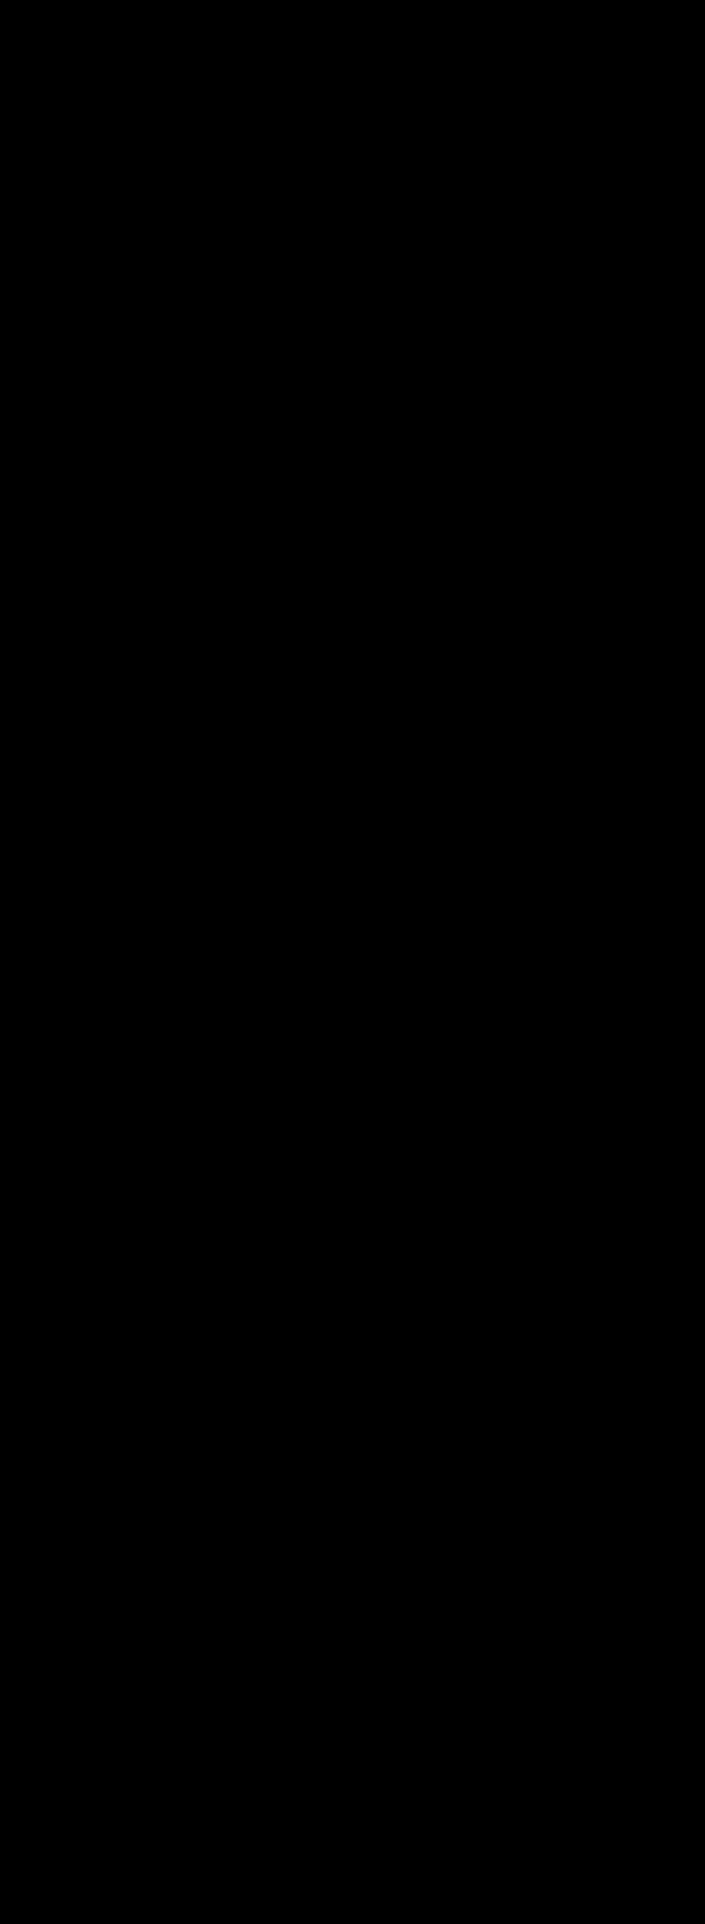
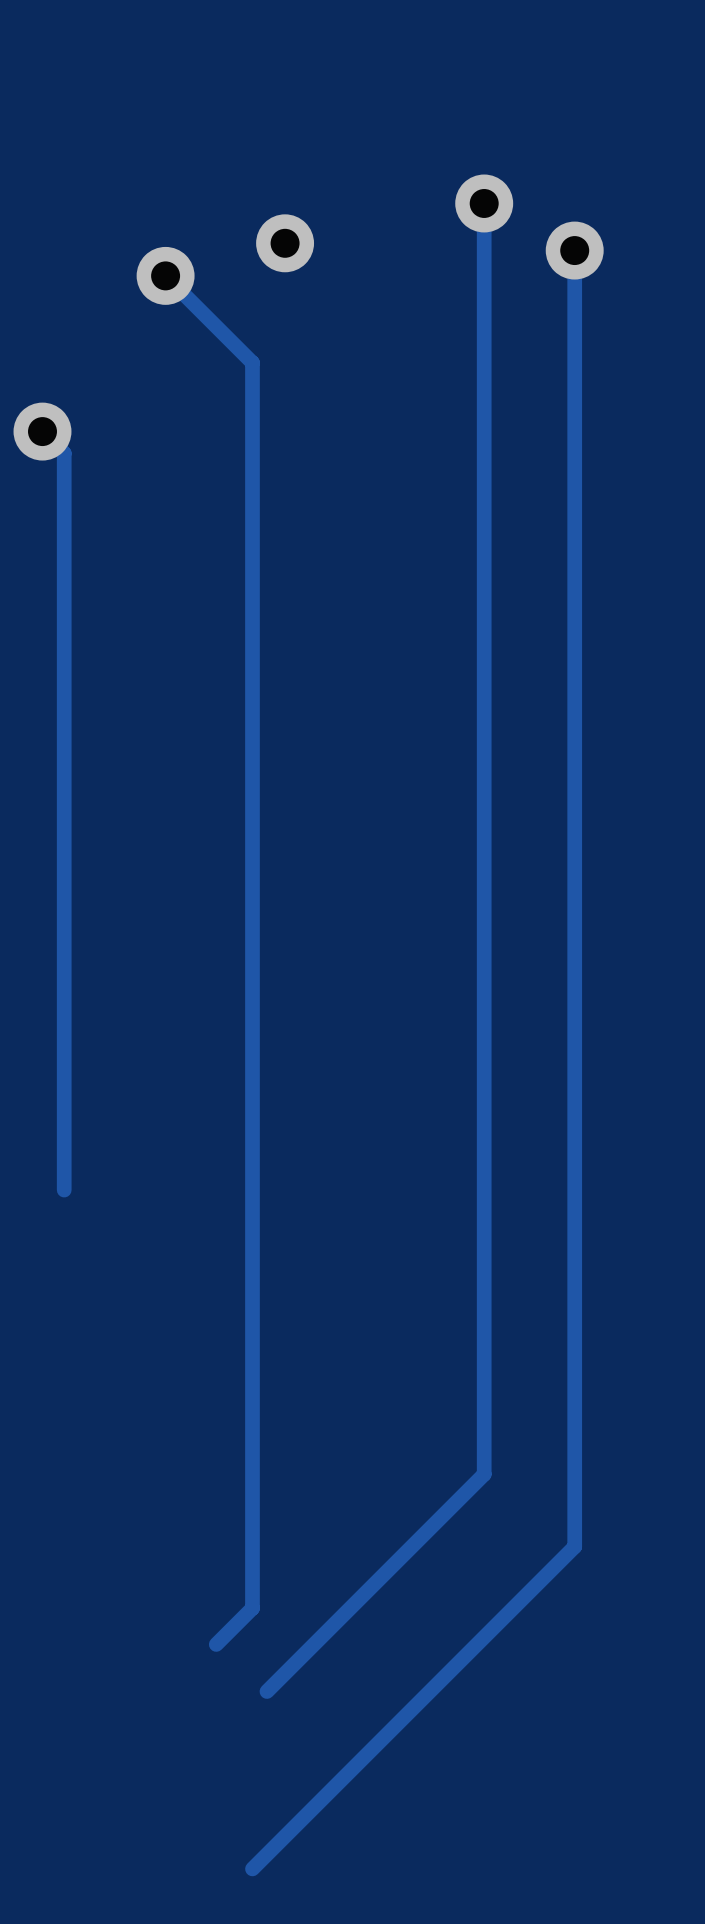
track: none -> (484, 203) (484, 1474) (266, 1691)
via: none -> (484, 203)
via: none -> (285, 243)
track: none -> (574, 250) (574, 1546) (252, 1868)
via: none -> (574, 250)
track: none -> (165, 275) (252, 362) (252, 1608) (216, 1644)
via: none -> (165, 275)
track: none -> (42, 431) (64, 453) (64, 1190)
via: none -> (42, 431)

